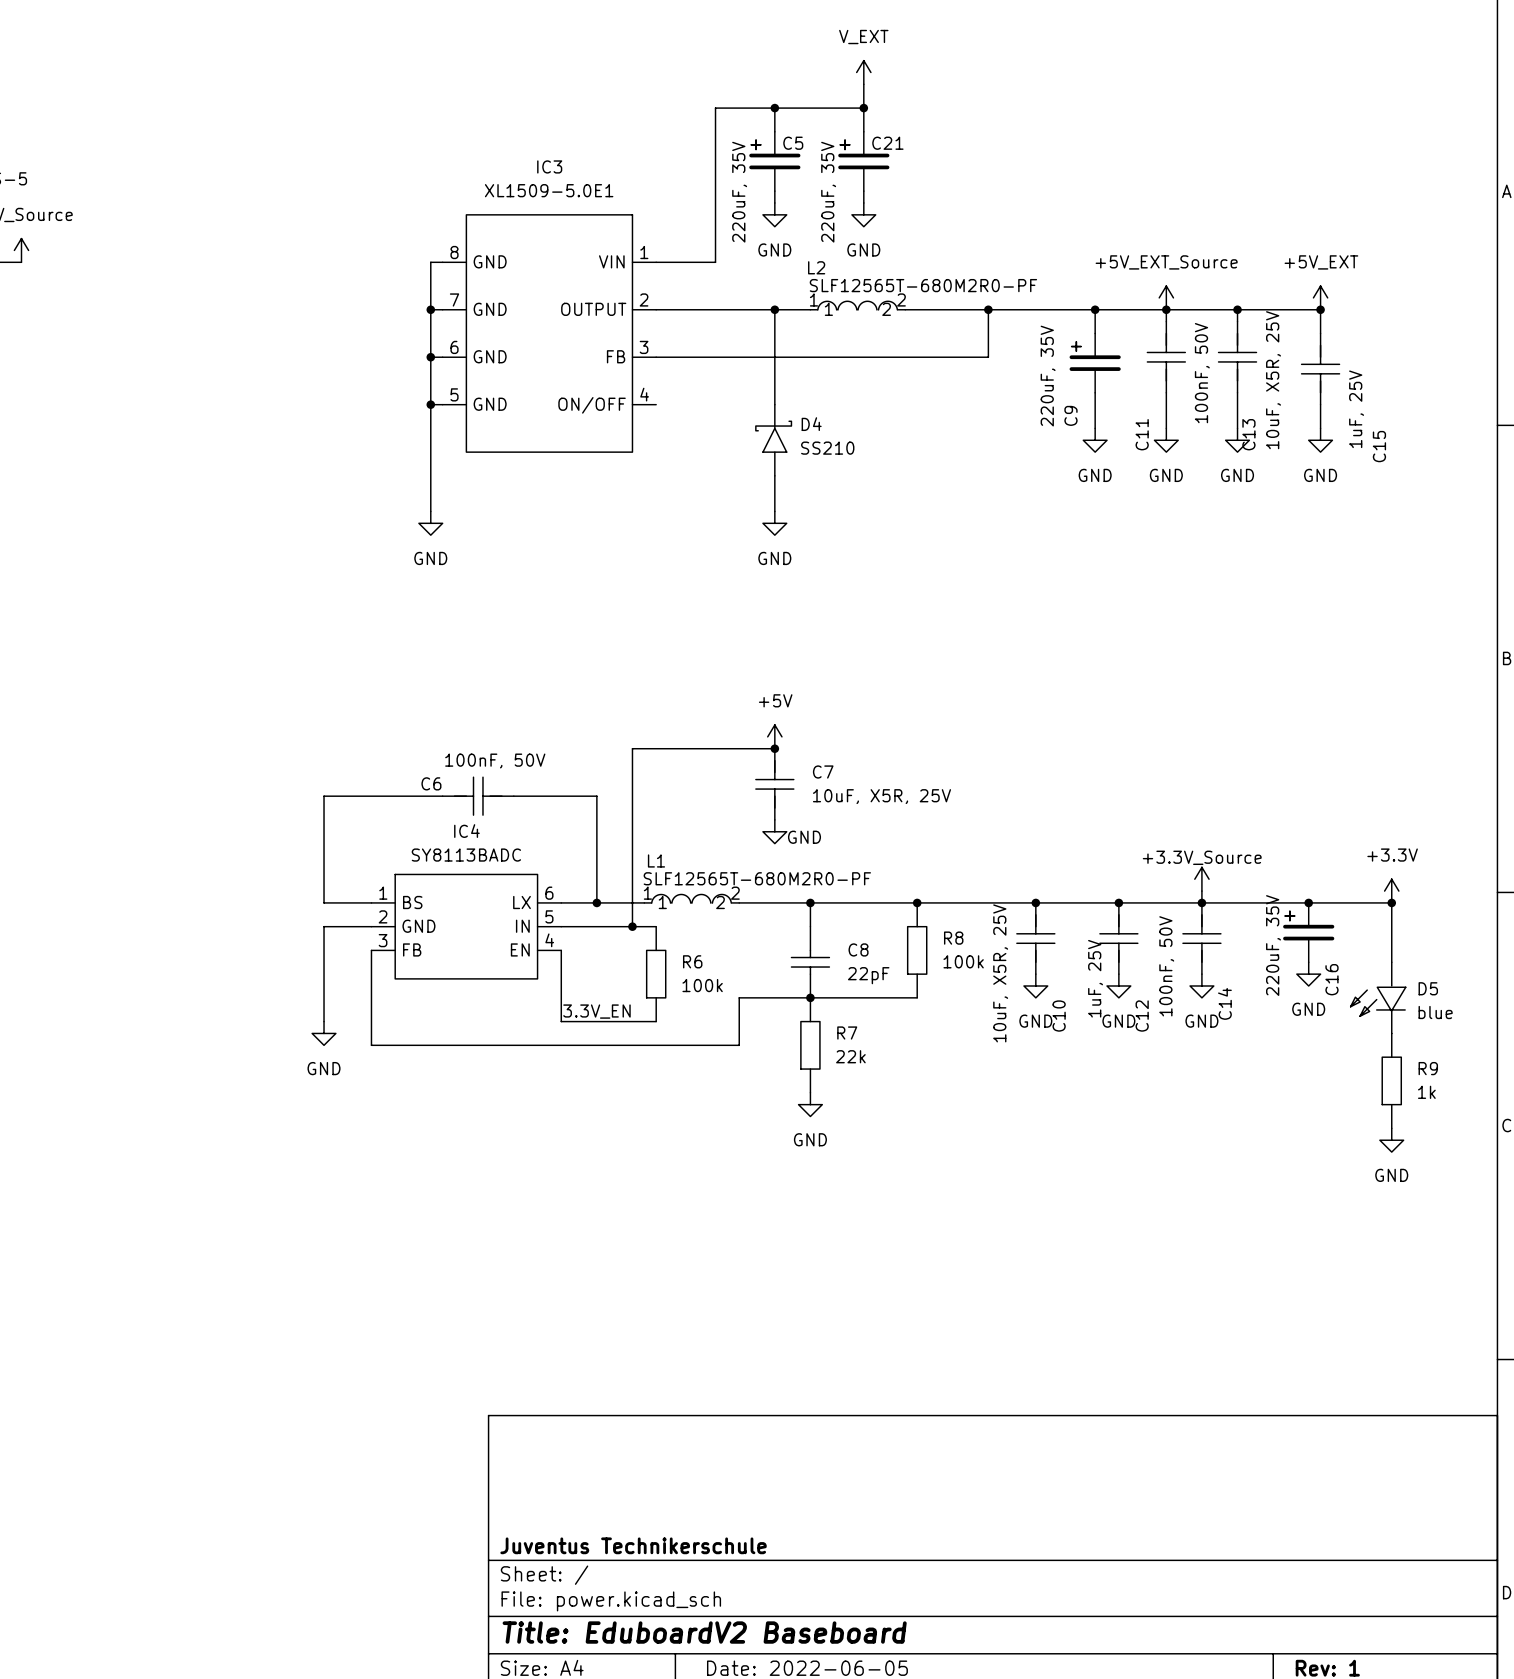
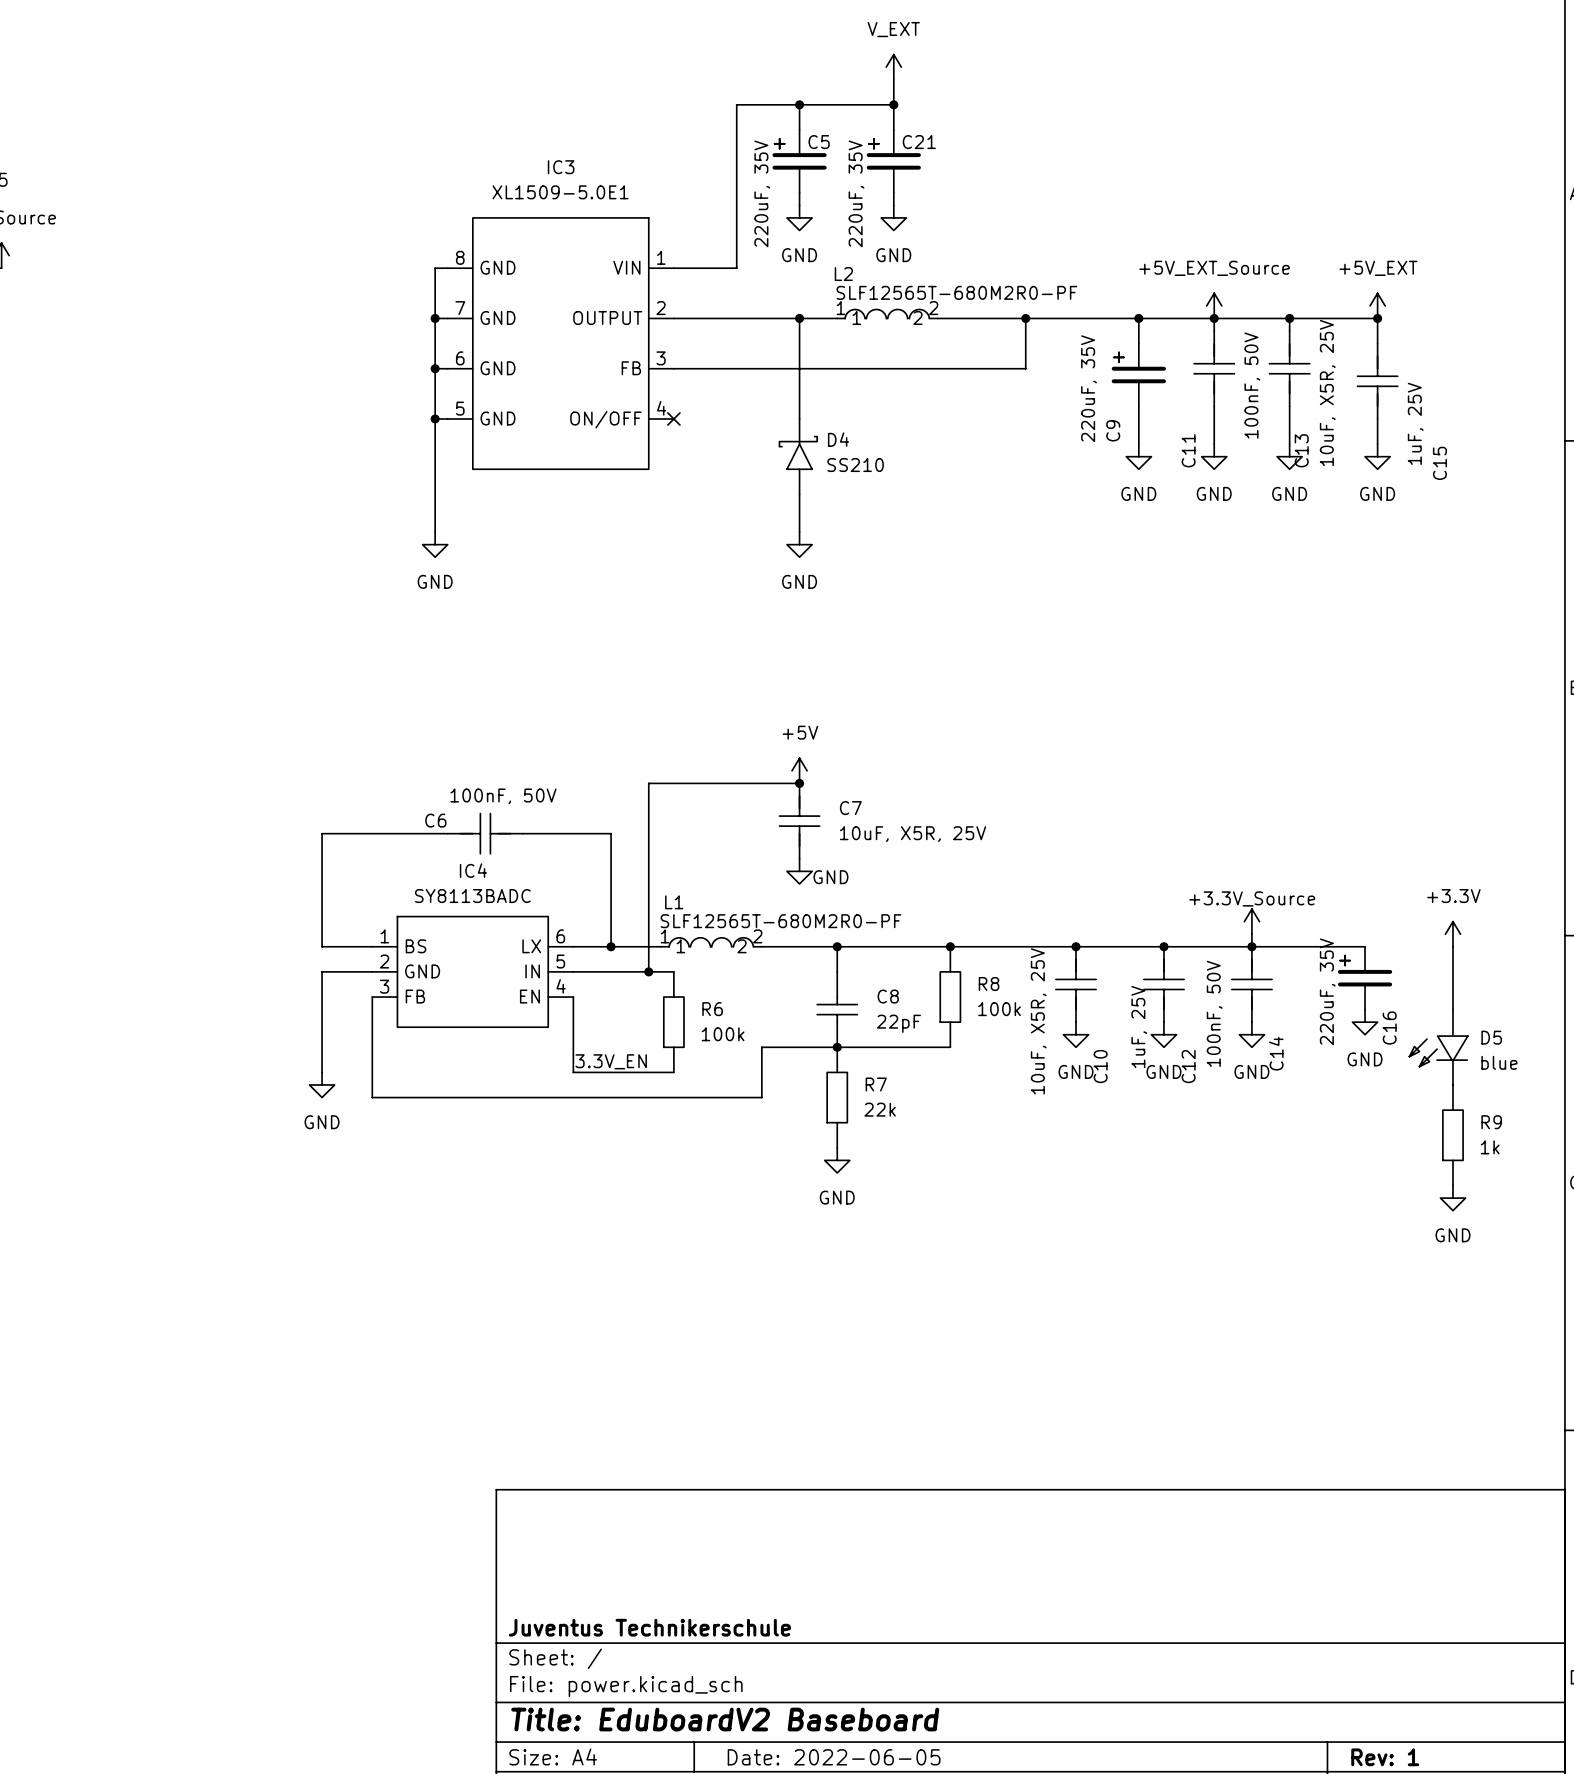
no-connect mark: none -> (673, 418)
wire: (1308, 902) (1391, 902) -> none
junction: (1308, 902) -> none
junction: (1391, 902) -> none

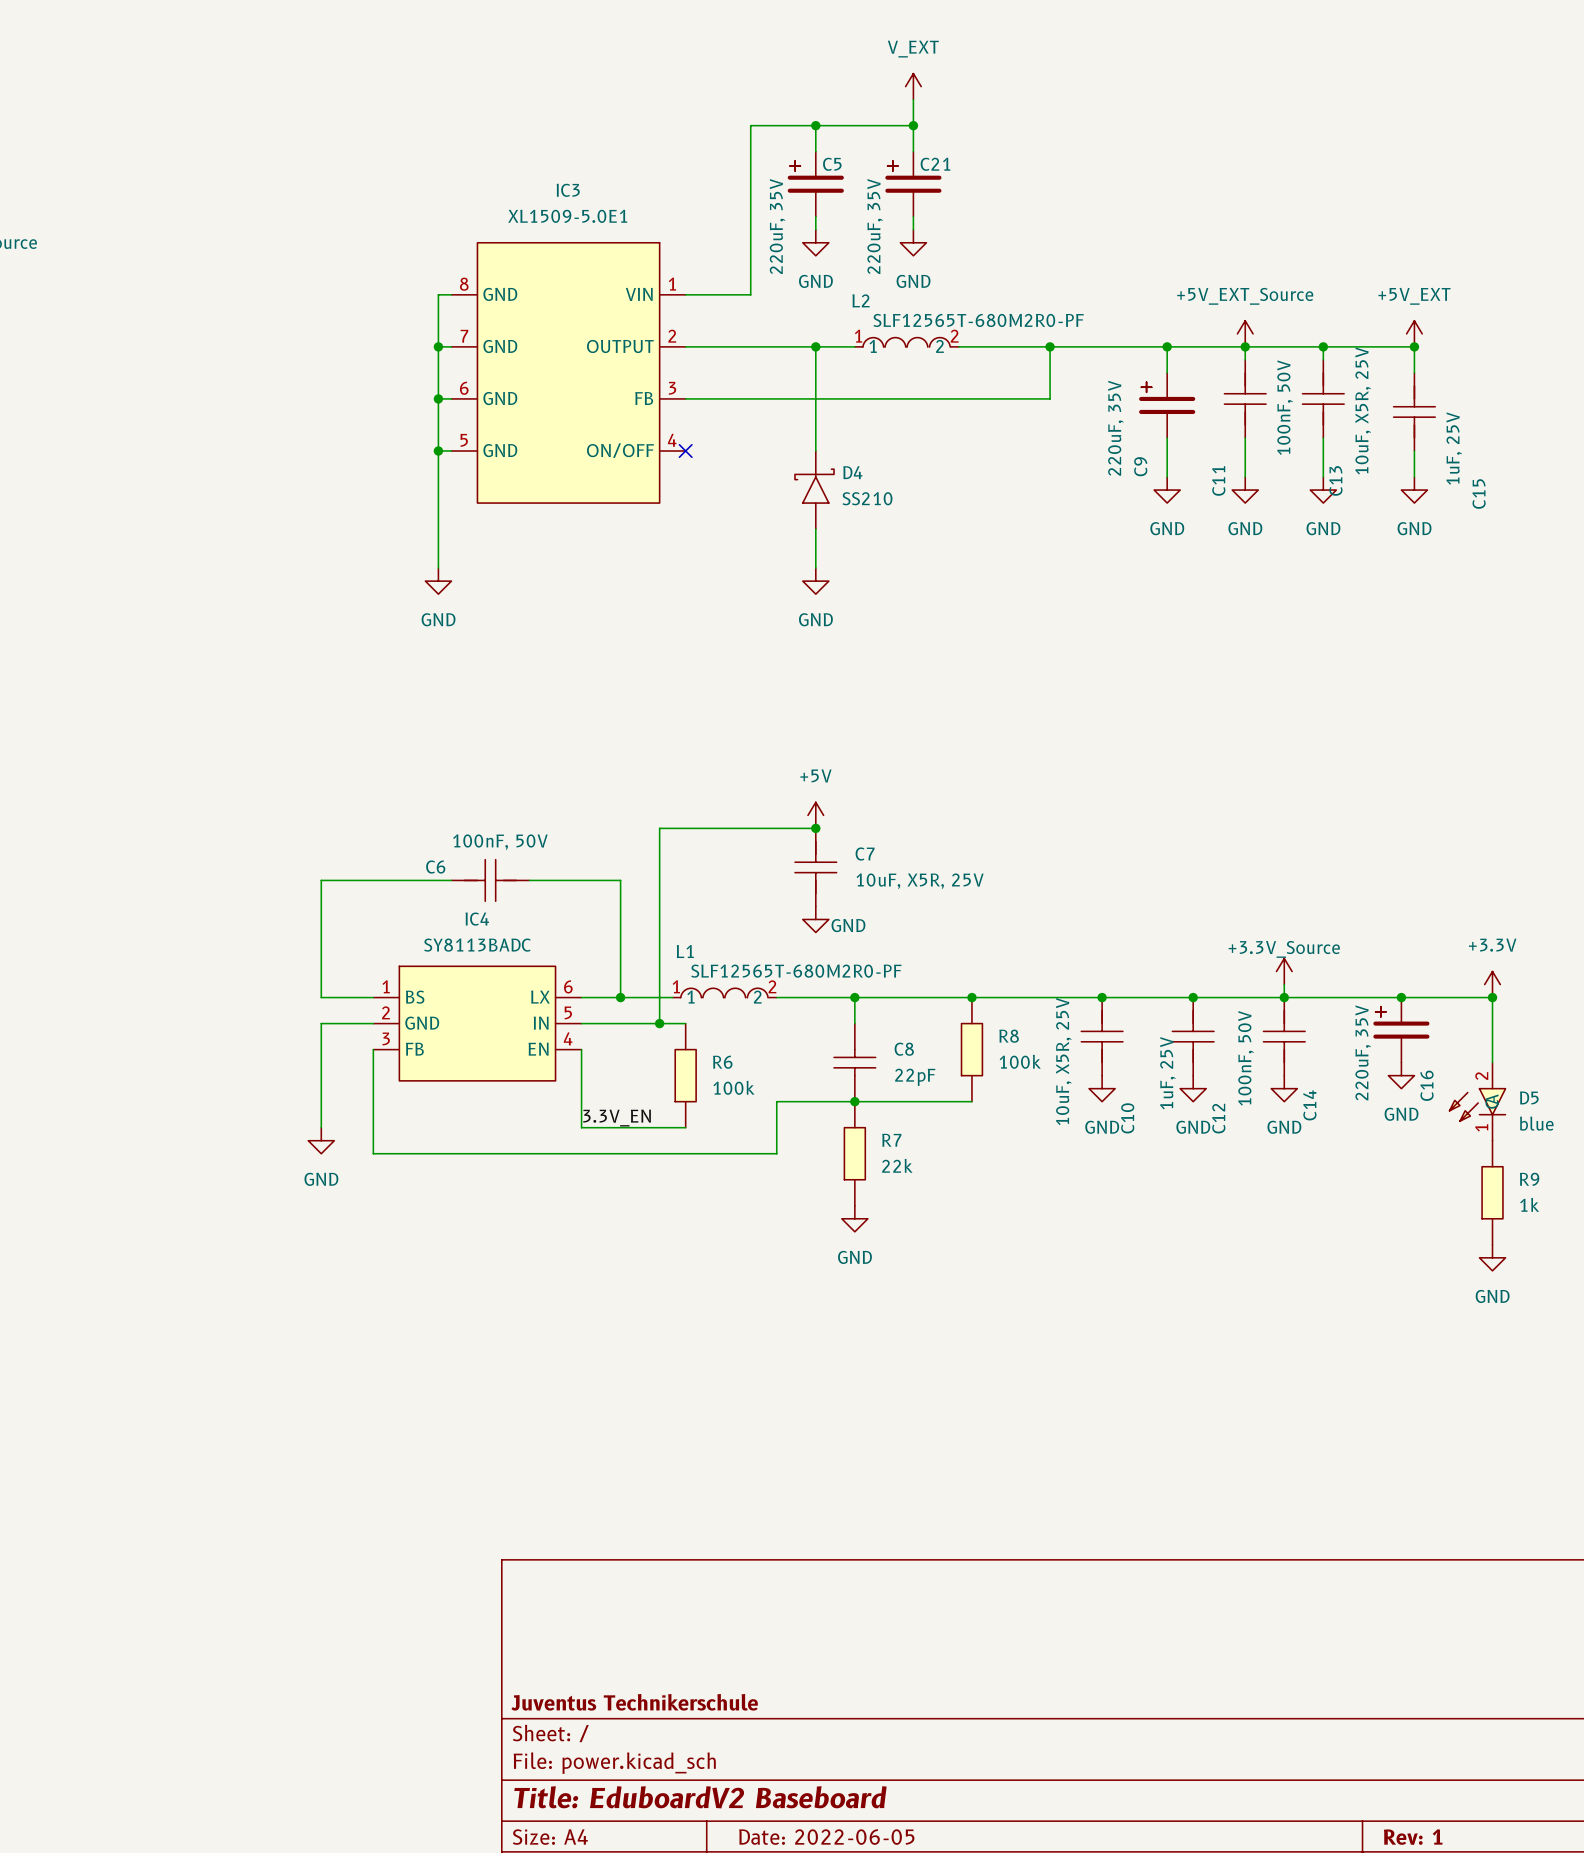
wire: none -> (1401, 997) (1492, 997)
junction: none -> (1401, 997)
junction: none -> (1492, 997)
D5 symbol: [1409, 1009, 1468, 1085] -> [1449, 1062, 1506, 1141]

